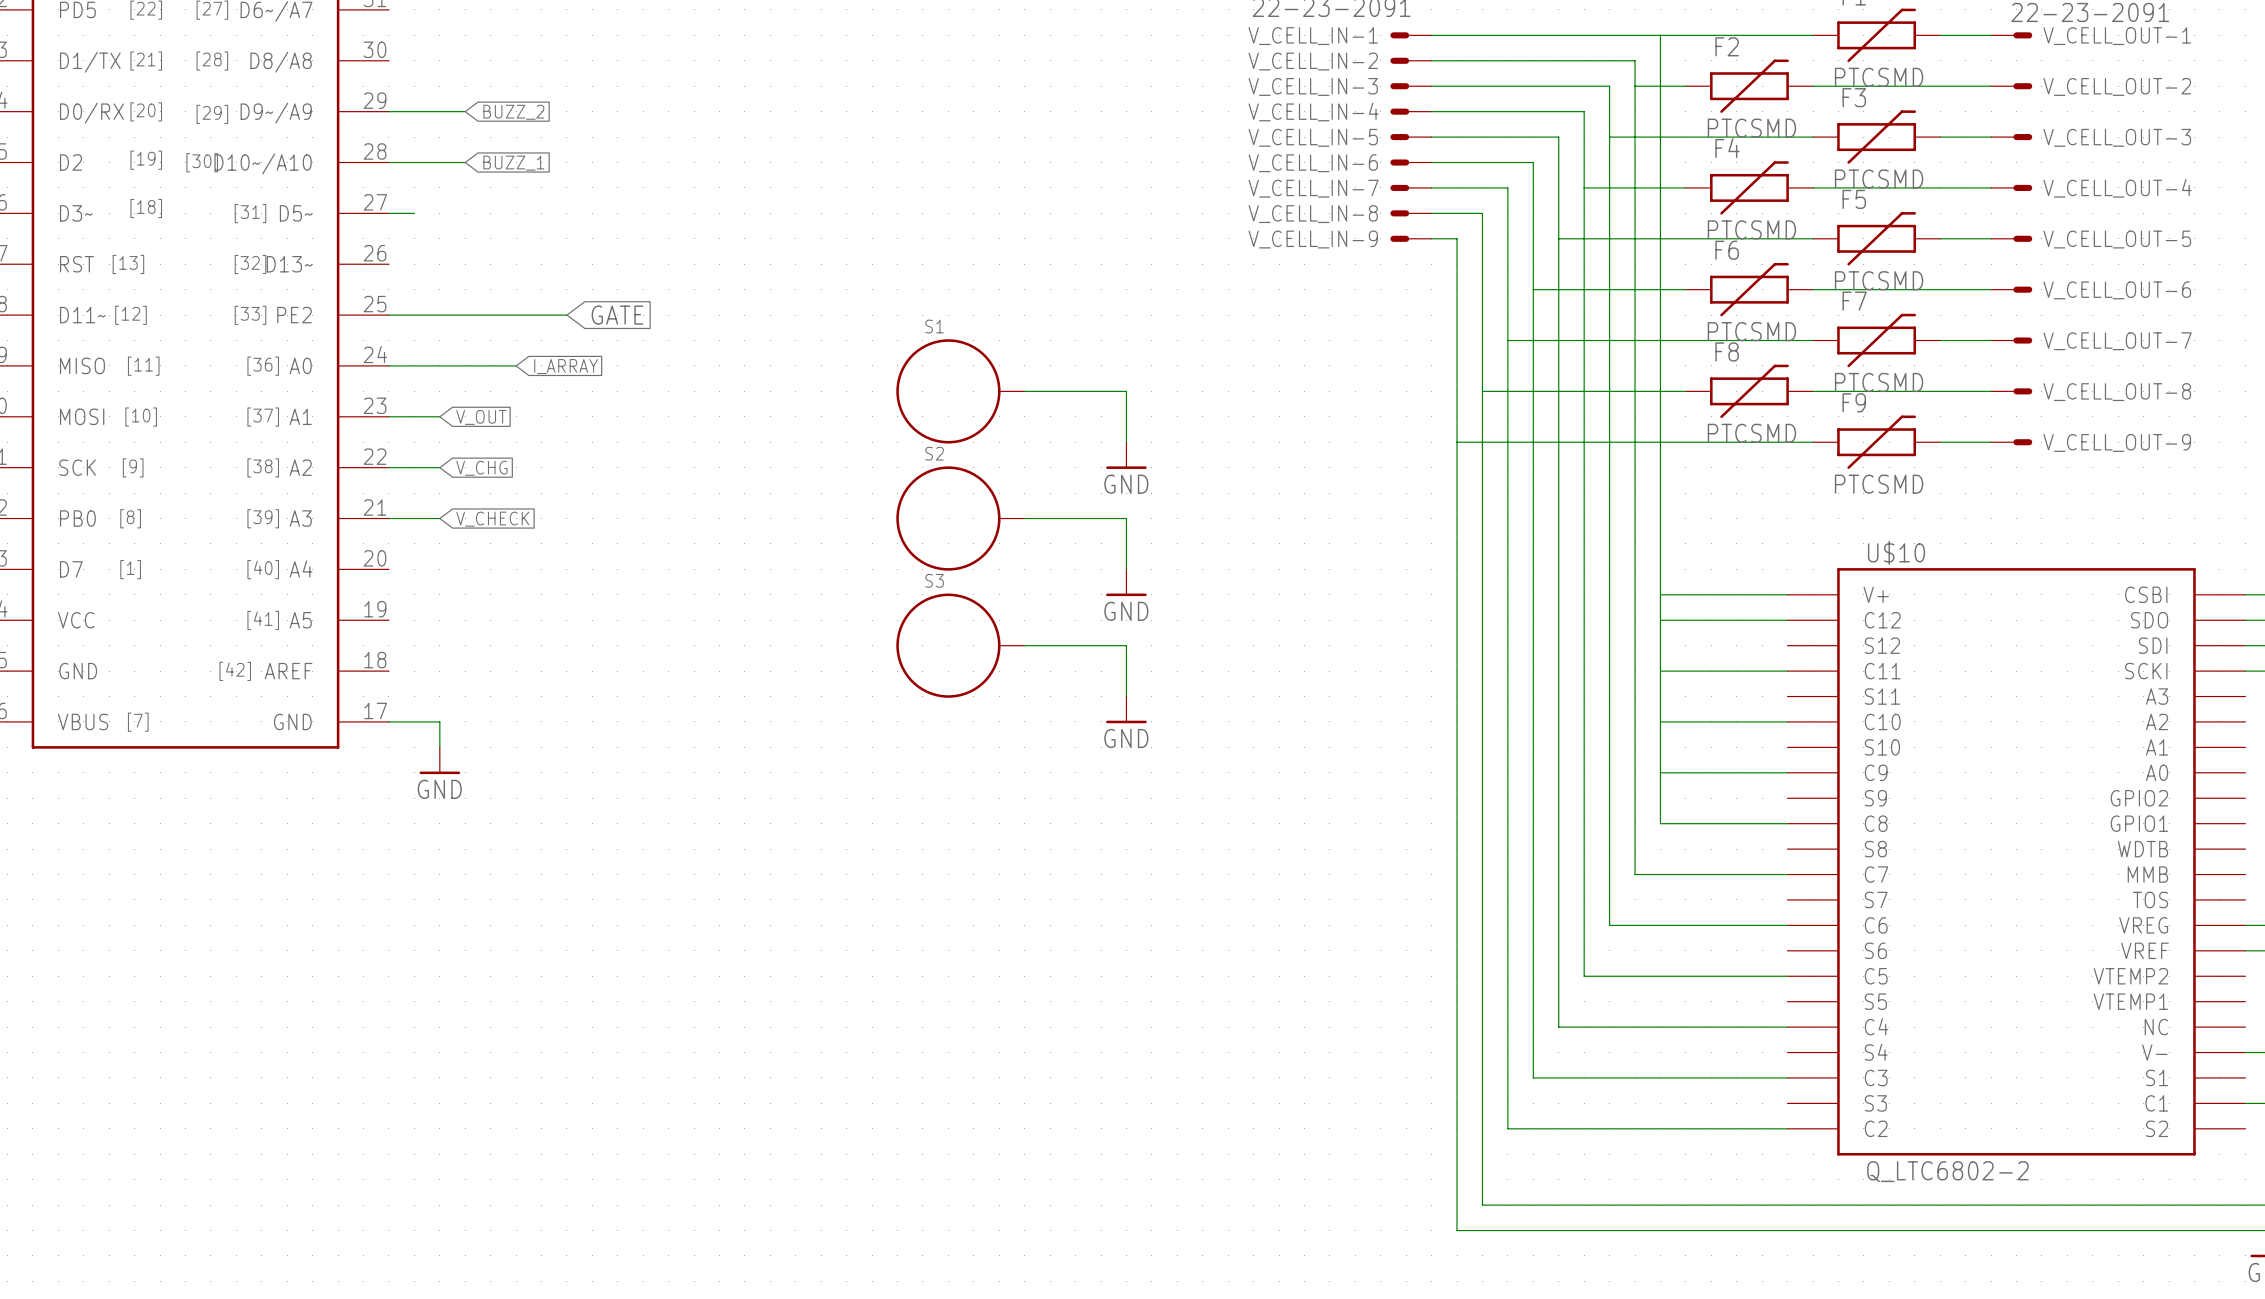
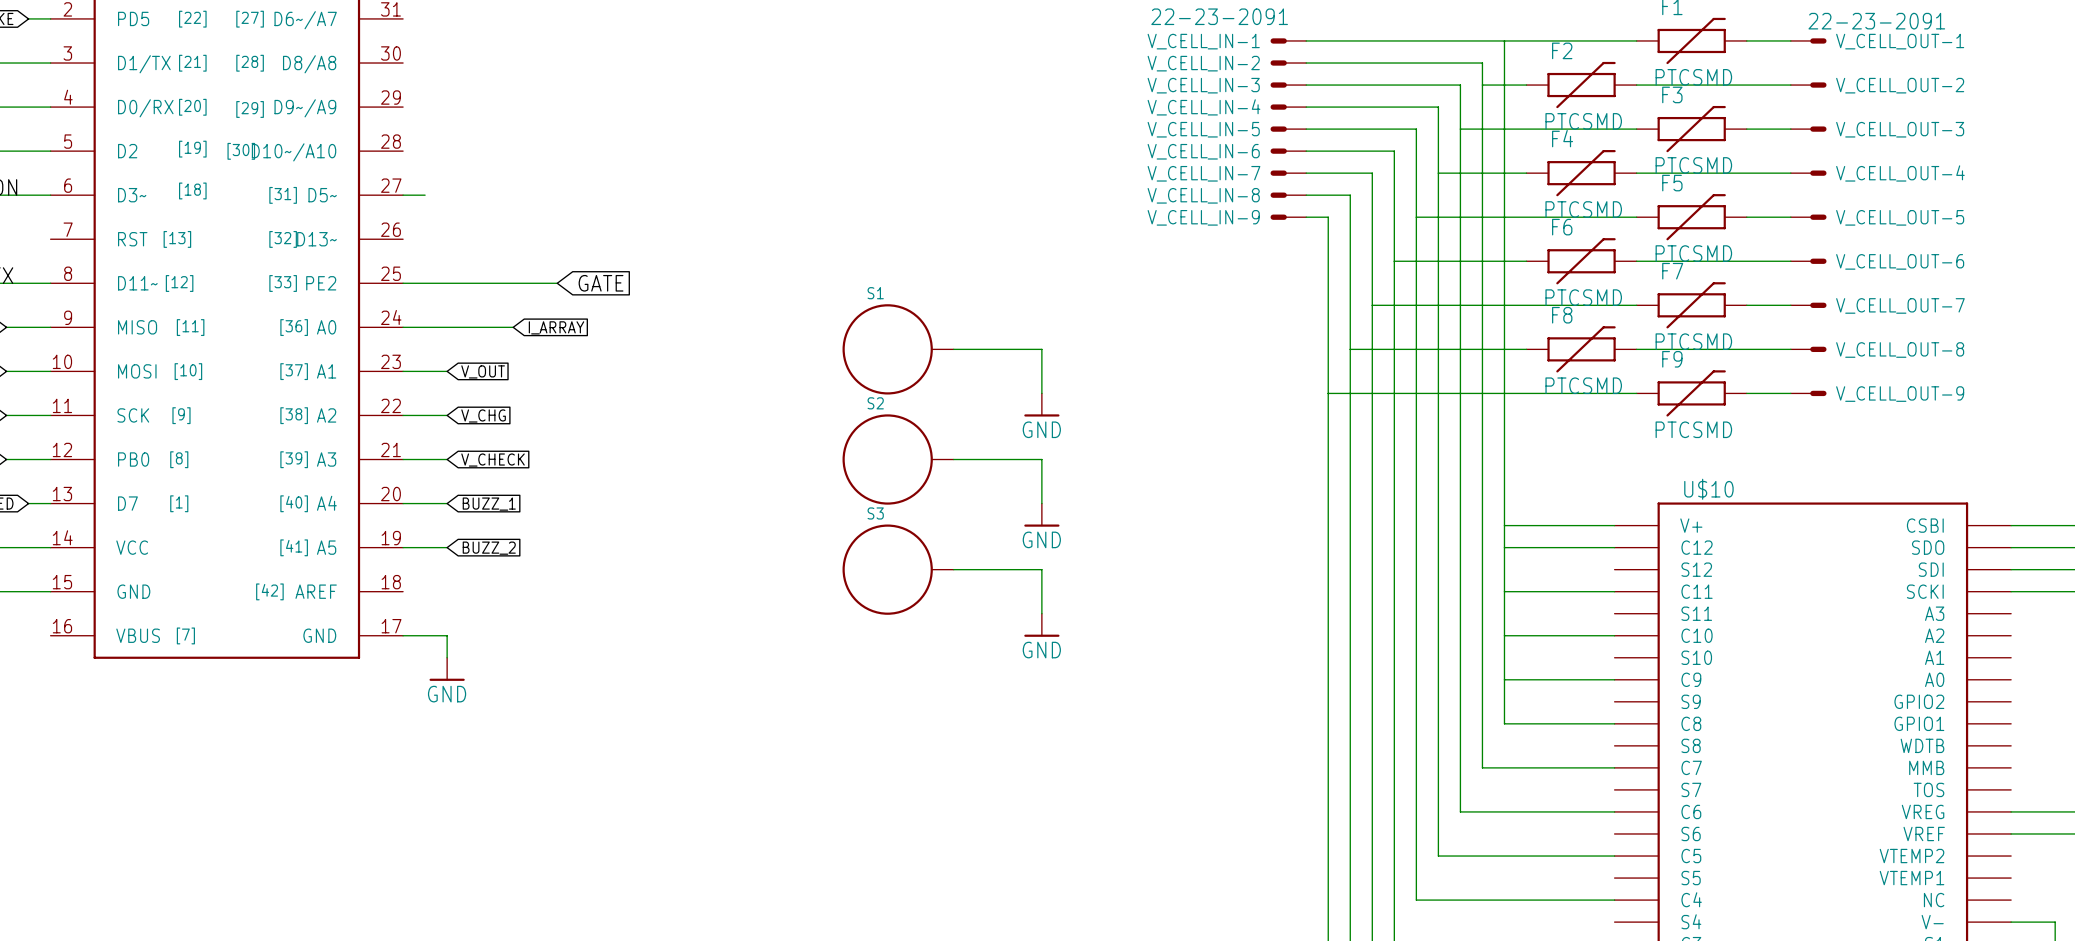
wire: (388, 111) (465, 111) -> none
global label: BUZZ_2 (513, 112) -> none
wire: (388, 162) (465, 162) -> none
global label: BUZZ_1 (513, 163) -> none
wire: none -> (403, 503) (447, 503)
global label: none -> BUZZ_1 (489, 504)
wire: none -> (403, 547) (447, 547)
global label: none -> BUZZ_2 (489, 548)

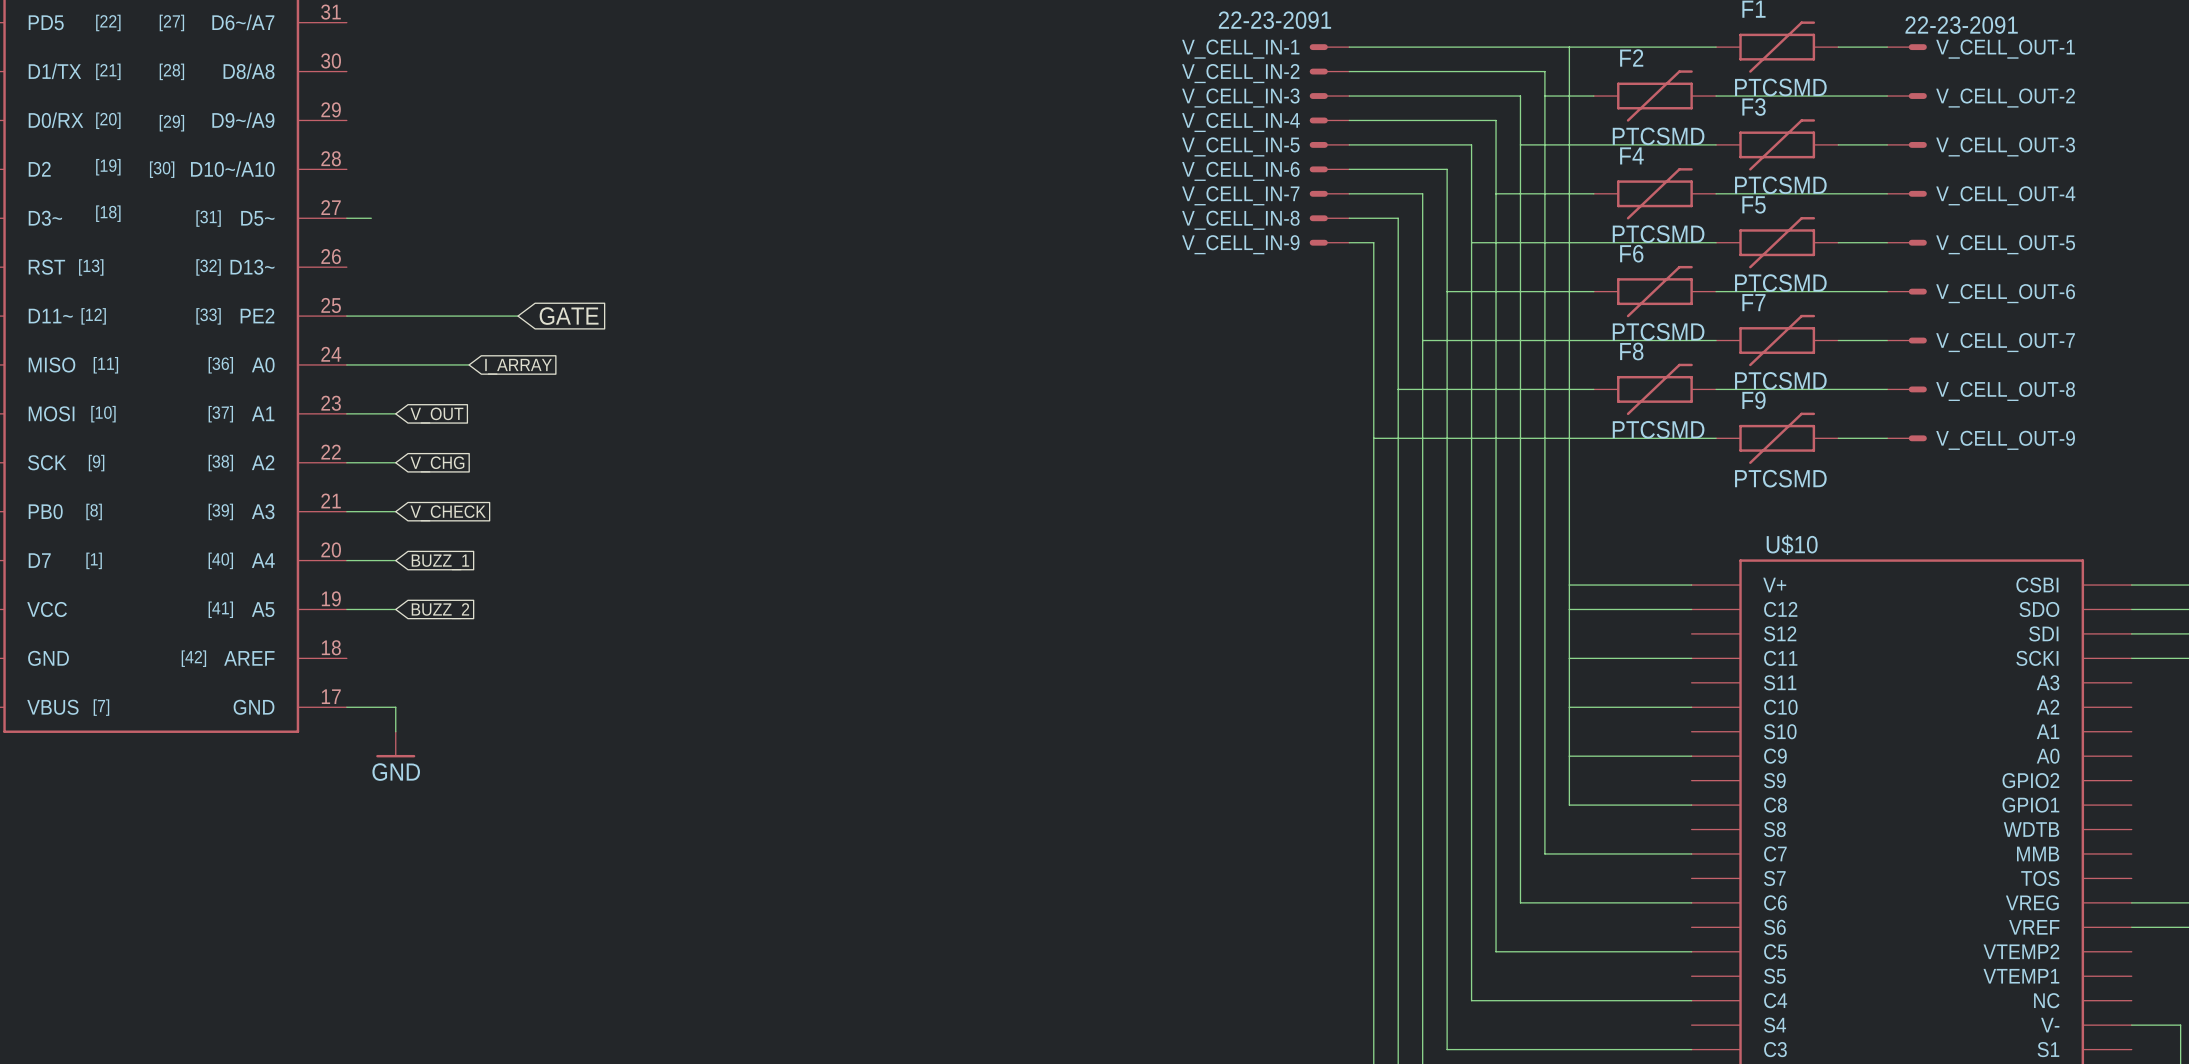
S1: (898, 349) -> none
wire: (953, 349) (1041, 349) (1041, 393) -> none
power symbol: GND (1041, 404) -> none
S2: (898, 459) -> none
wire: (953, 459) (1041, 459) (1041, 503) -> none
power symbol: GND (1041, 515) -> none
S3: (898, 569) -> none
wire: (953, 569) (1041, 569) (1041, 613) -> none
power symbol: GND (1041, 625) -> none

